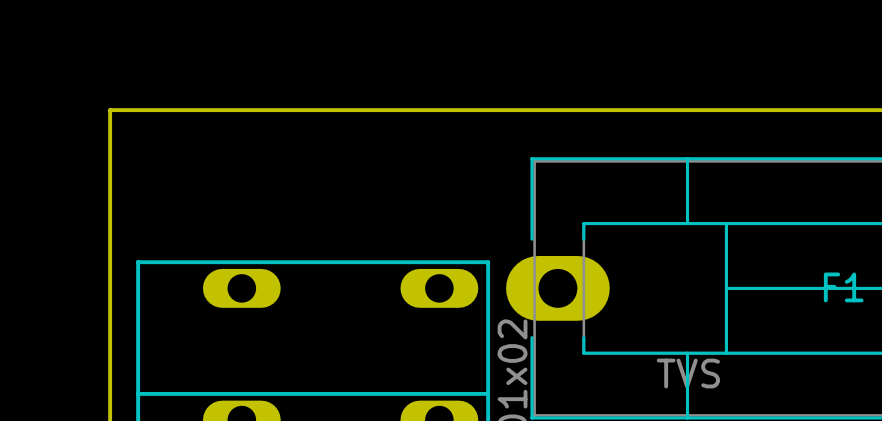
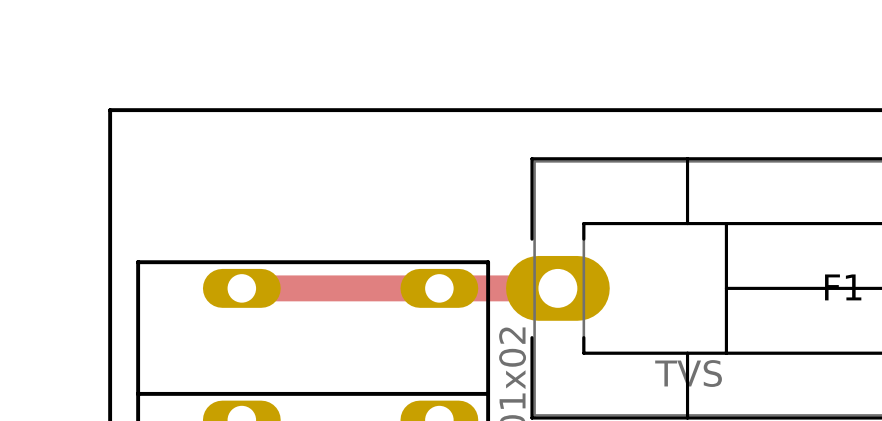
top track: none -> (241, 288) (557, 288)

